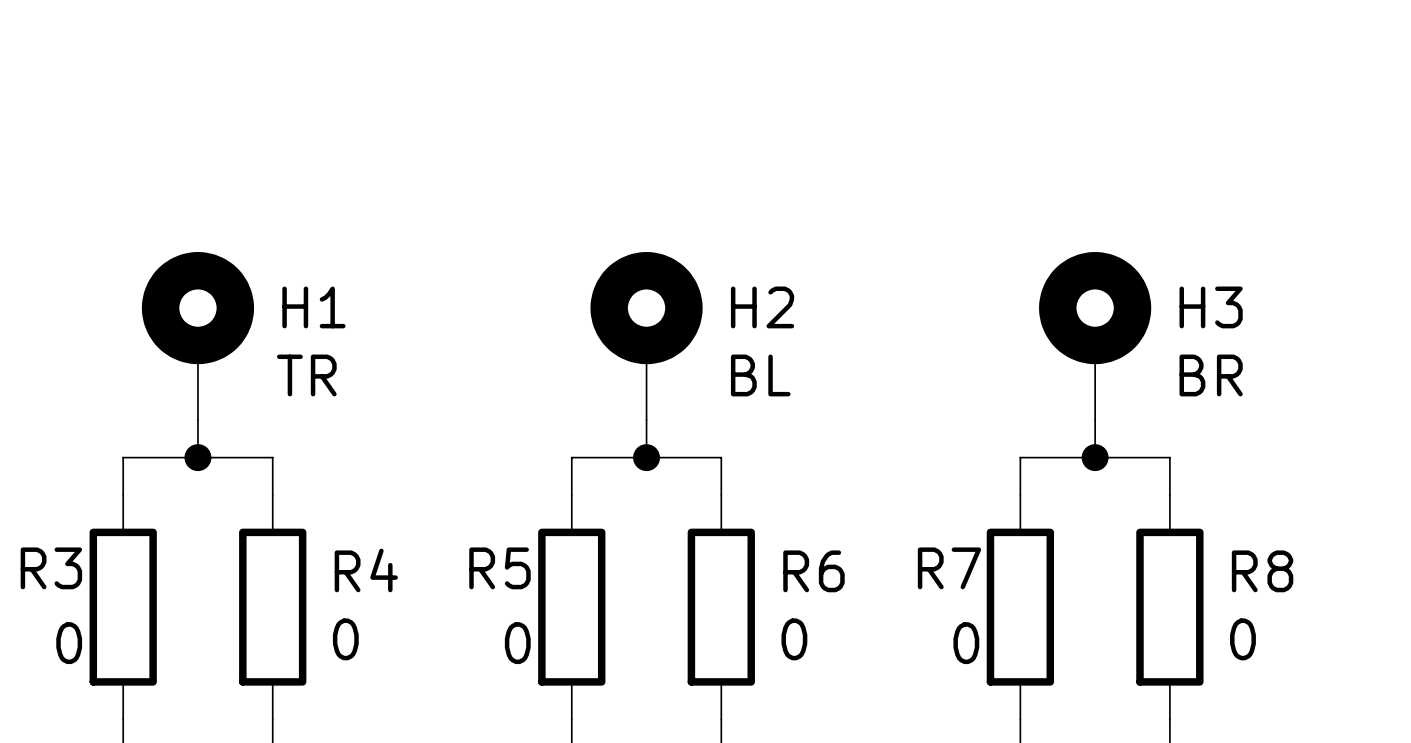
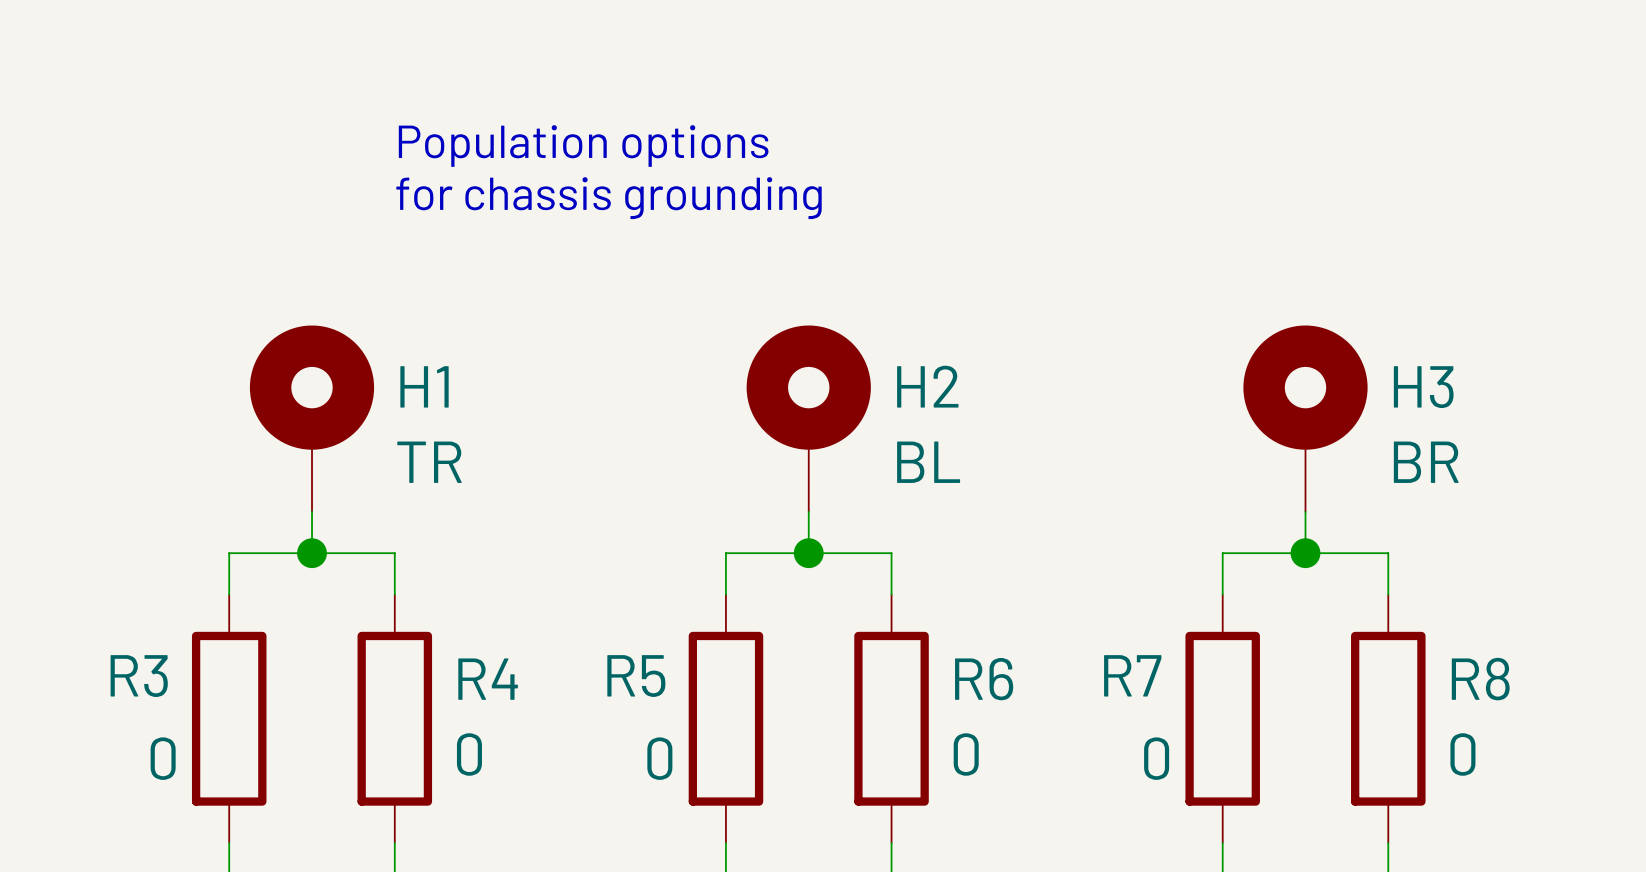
text: none -> Population options (583, 146)
text: none -> for chassis grounding (609, 198)

